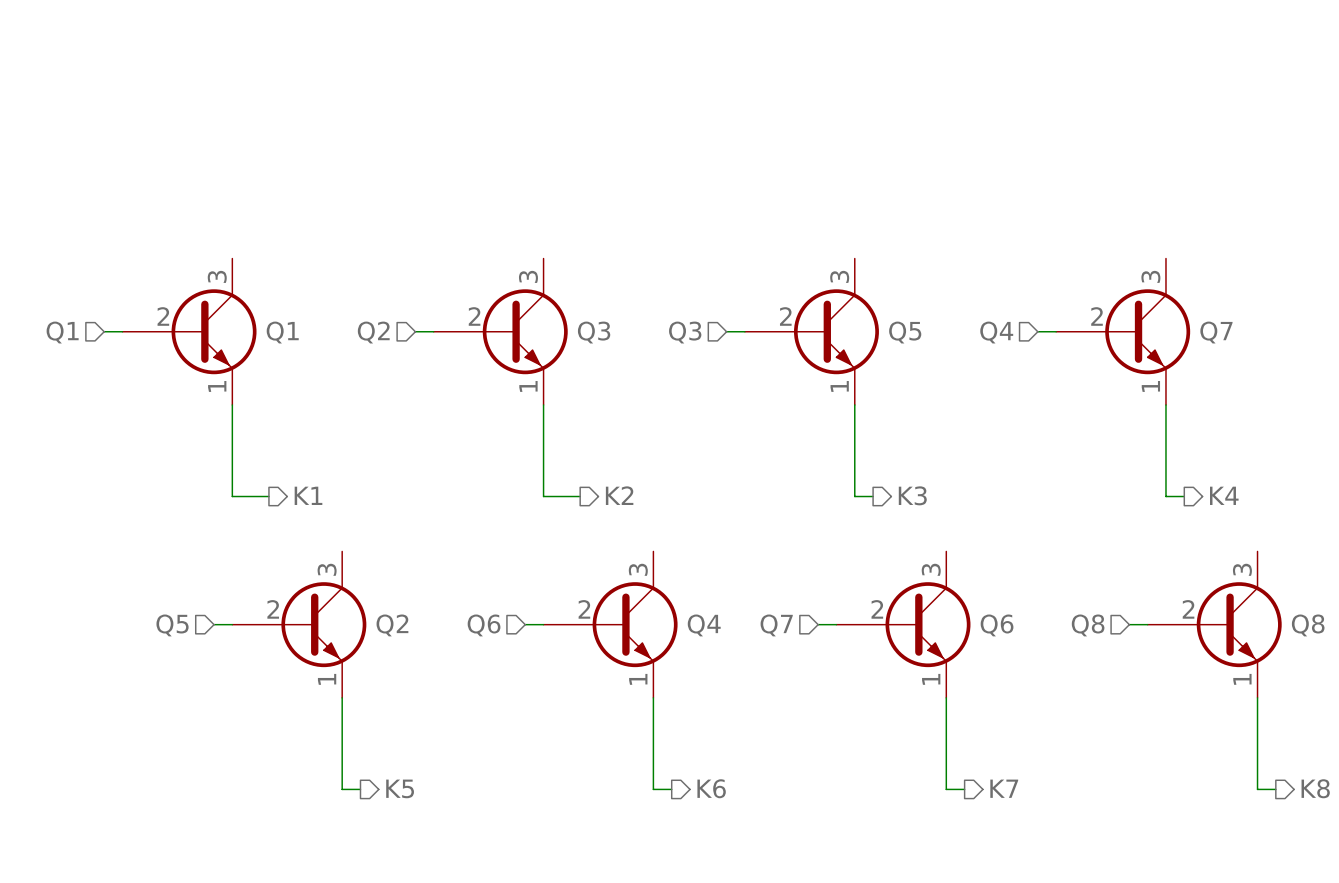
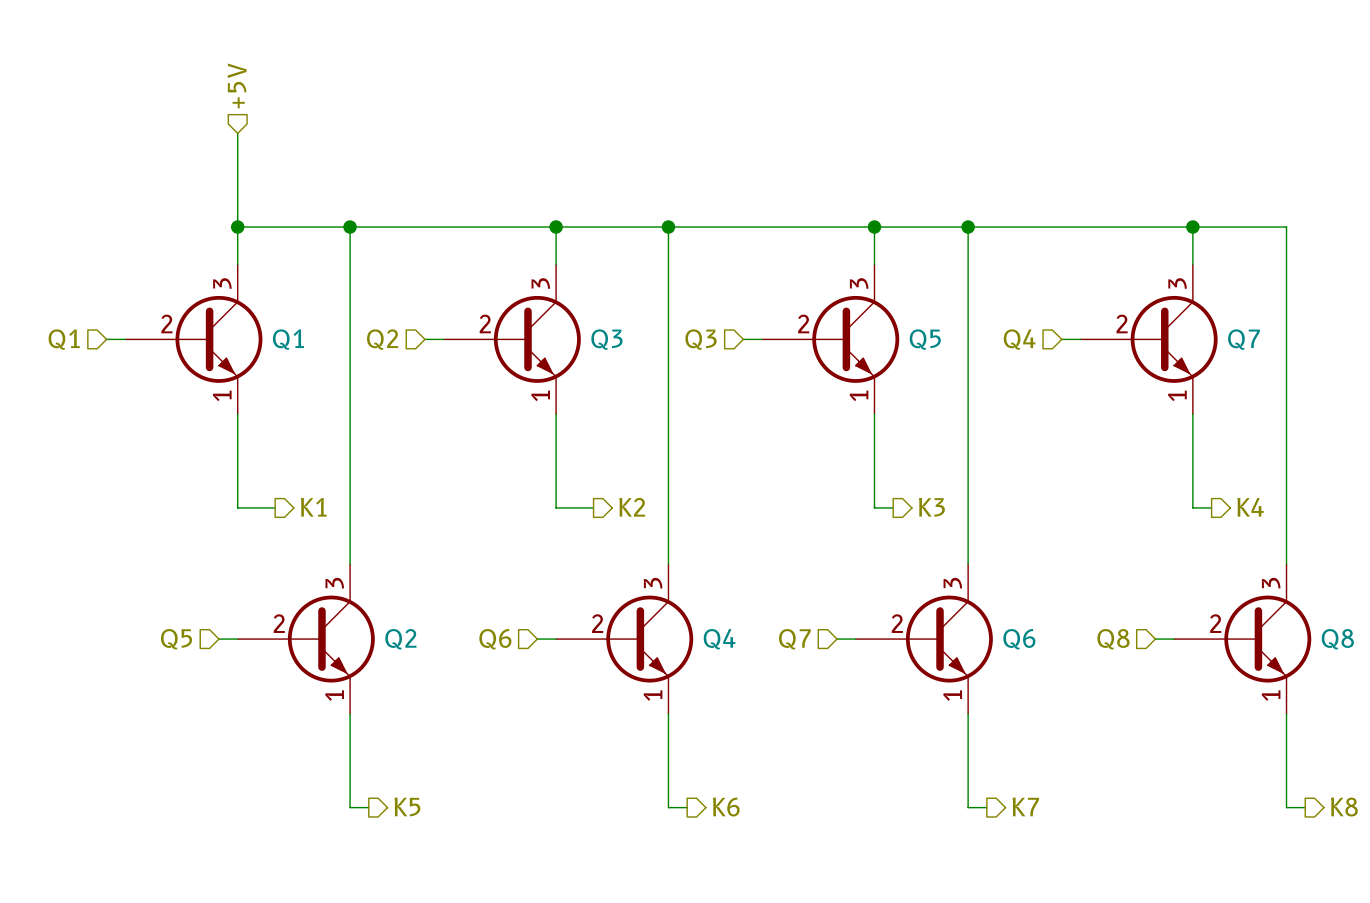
hierarchical label: none -> +5V (237, 85)
wire: none -> (237, 133) (237, 264)
wire: none -> (237, 227) (1286, 227) (1286, 564)
junction: none -> (237, 227)
wire: none -> (350, 227) (350, 564)
junction: none -> (350, 227)
wire: none -> (556, 227) (556, 264)
junction: none -> (556, 227)
wire: none -> (668, 227) (668, 564)
junction: none -> (668, 227)
wire: none -> (874, 227) (874, 264)
junction: none -> (874, 227)
wire: none -> (968, 227) (968, 564)
junction: none -> (968, 227)
wire: none -> (1192, 227) (1192, 264)
junction: none -> (1192, 227)

